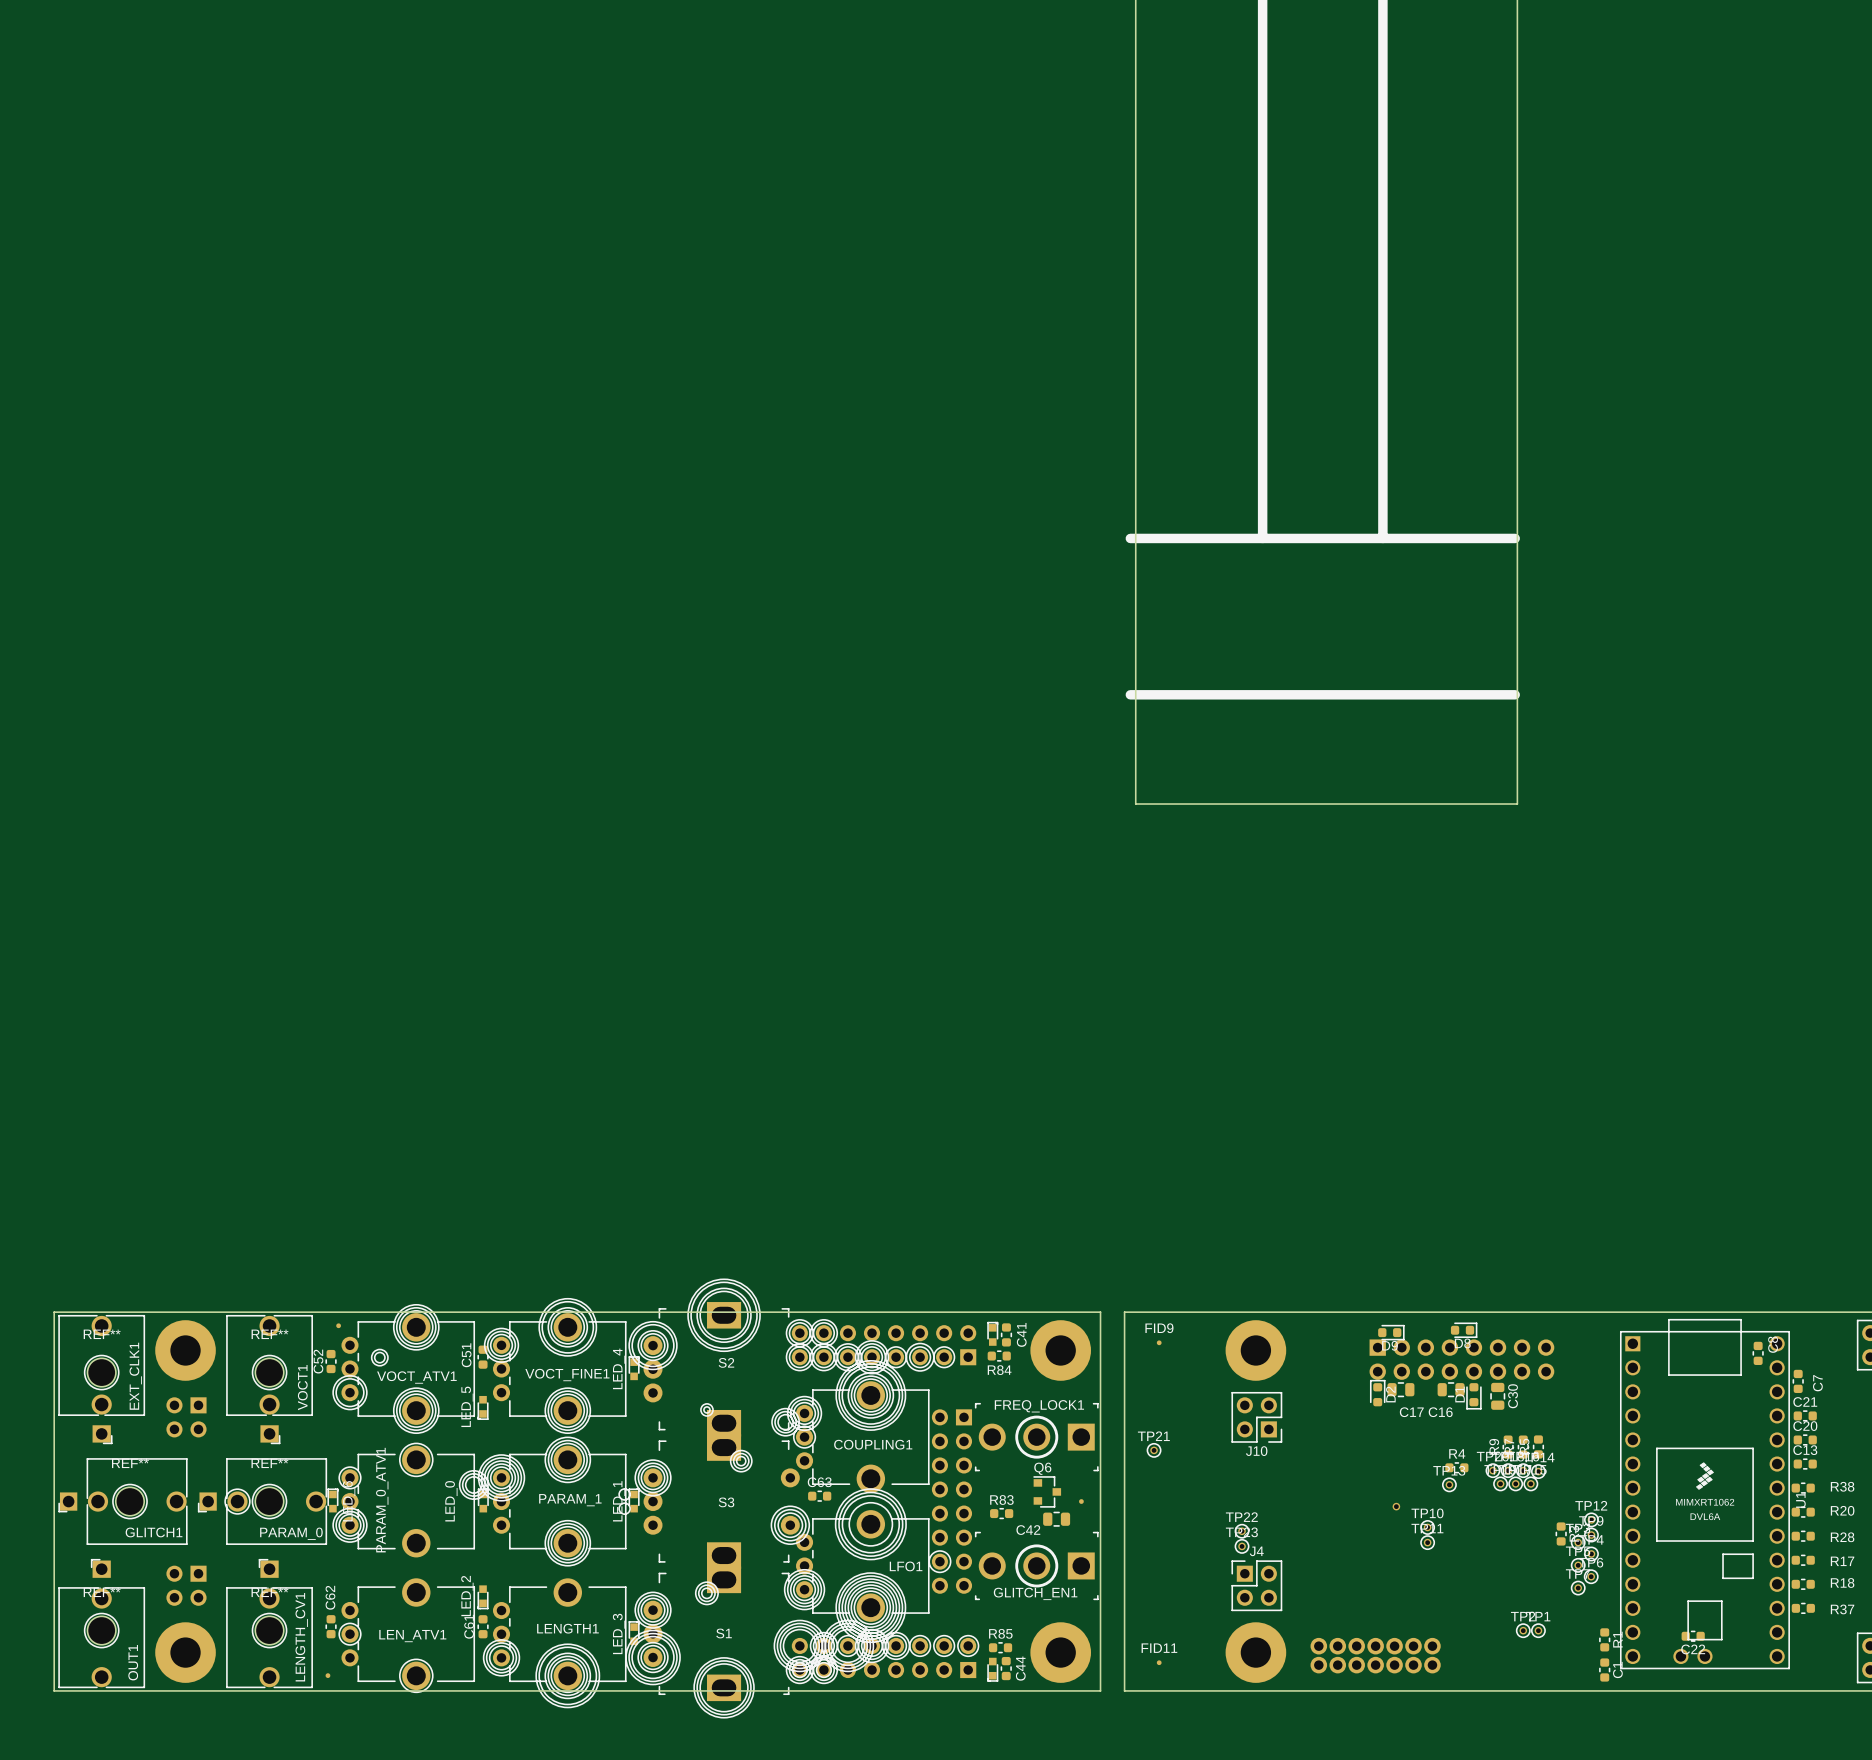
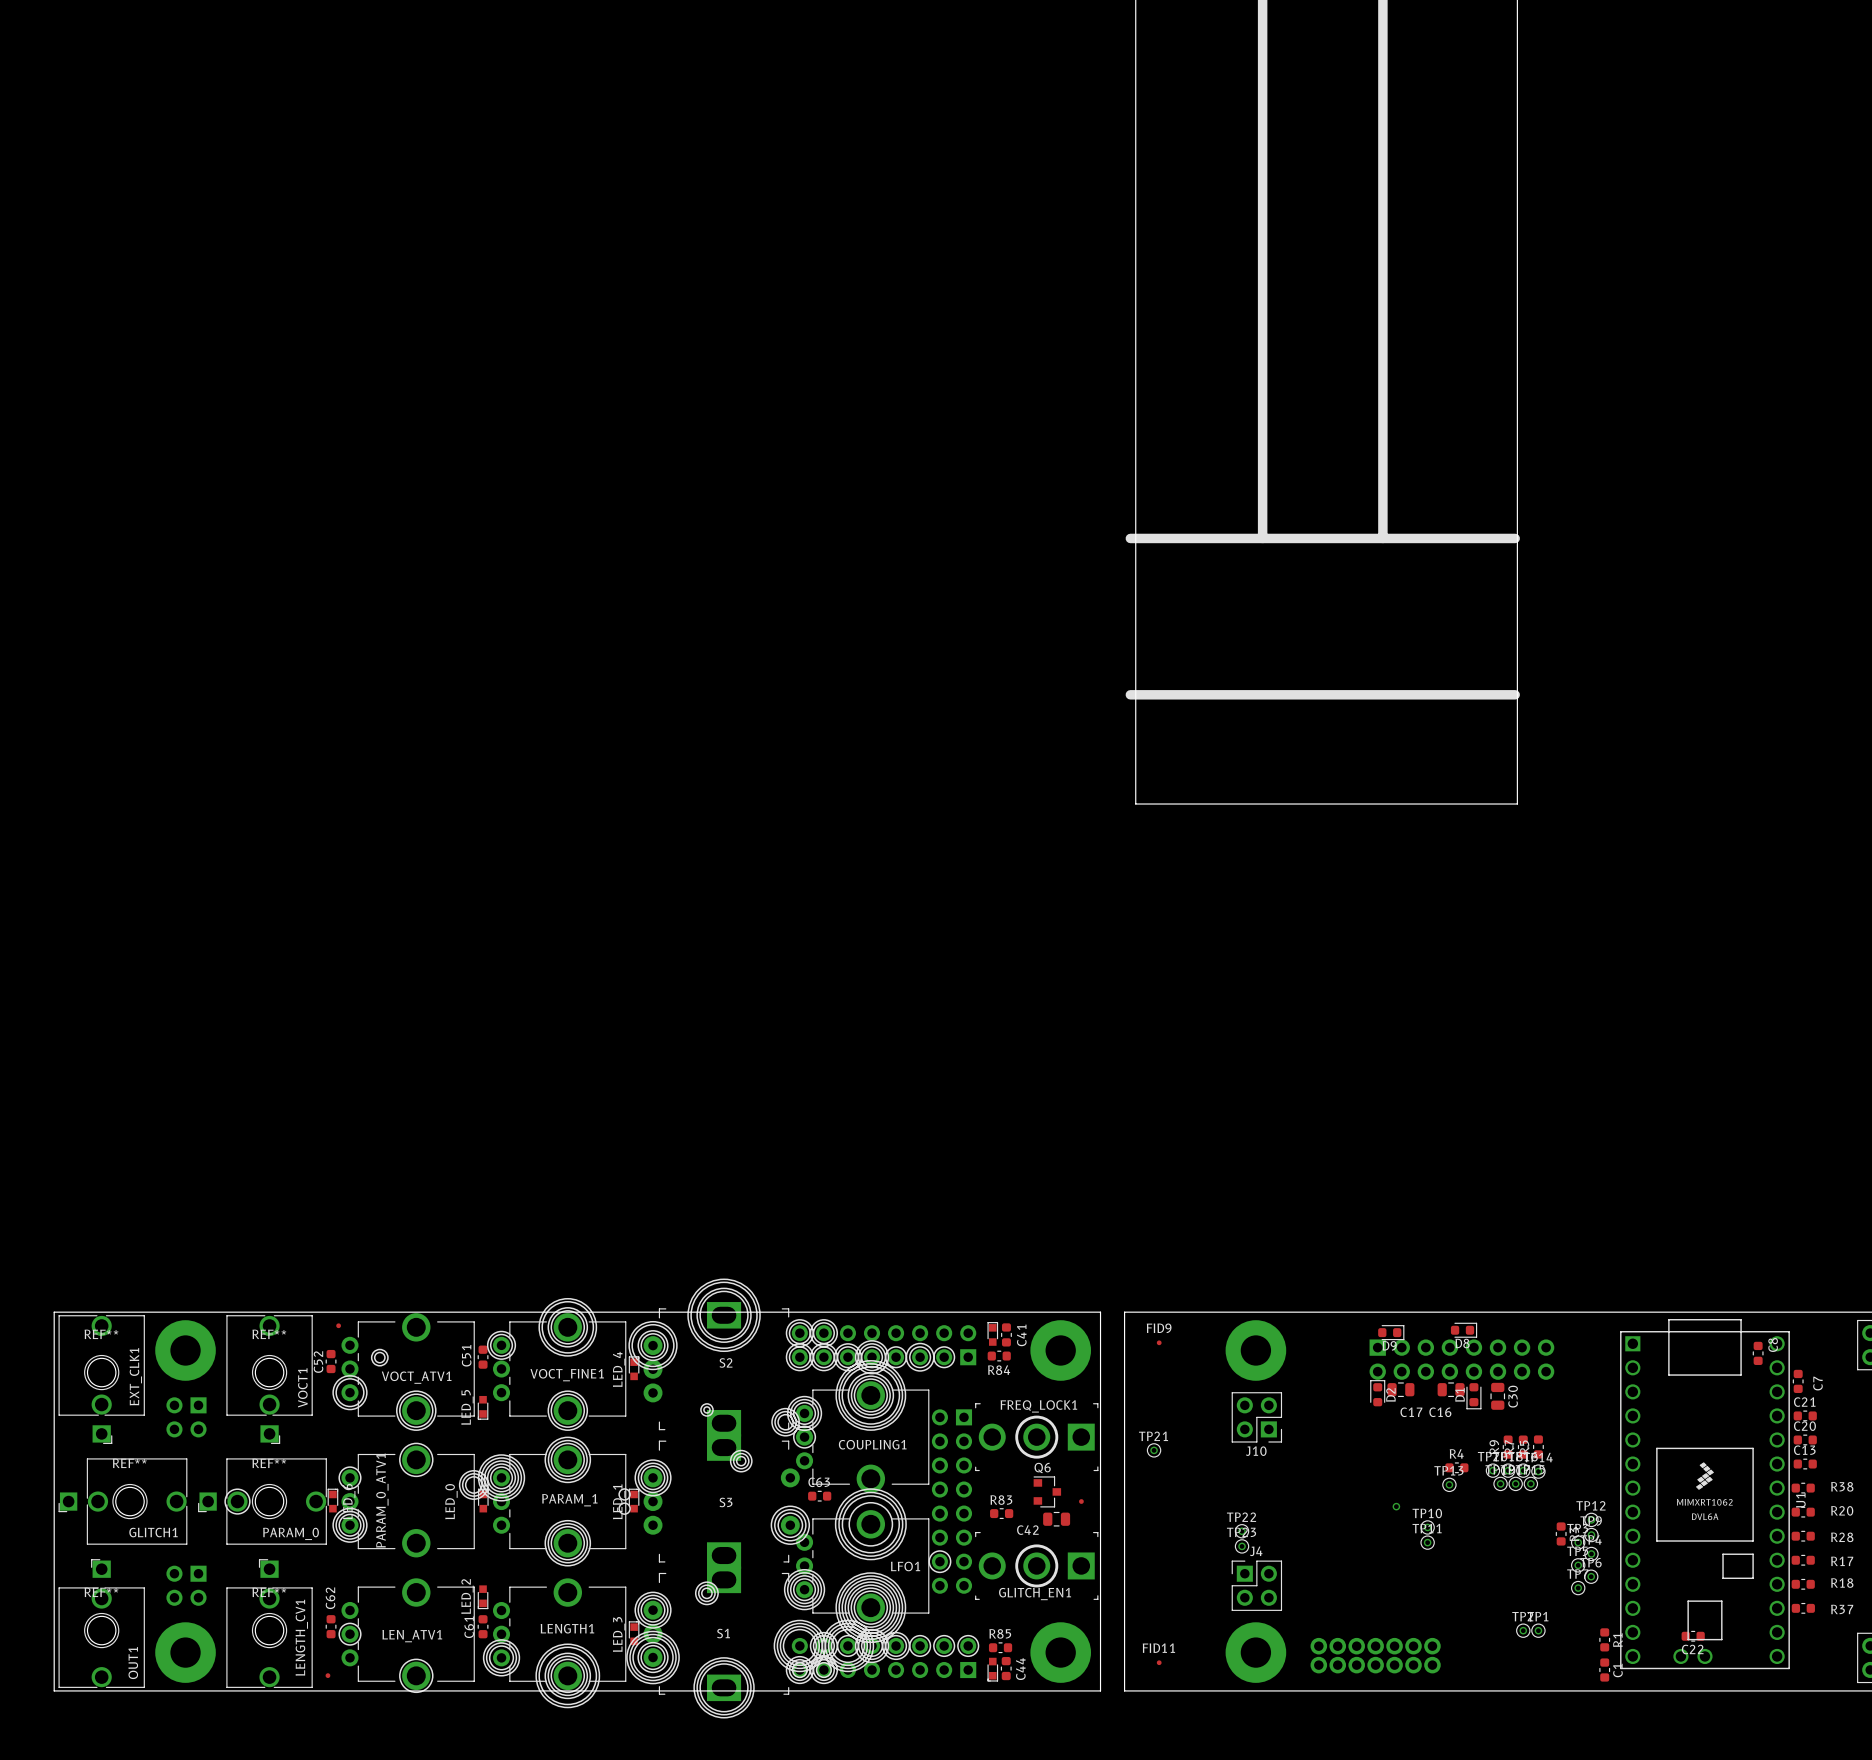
drawing: [392, 1304, 440, 1351] -> none
drawing: [483, 1327, 520, 1363] -> none
drawing: [392, 1387, 440, 1434] -> none
drawing: [544, 1387, 592, 1434] -> none
drawing: [625, 1629, 681, 1686] -> none
drawing: none -> [626, 1630, 680, 1685]

